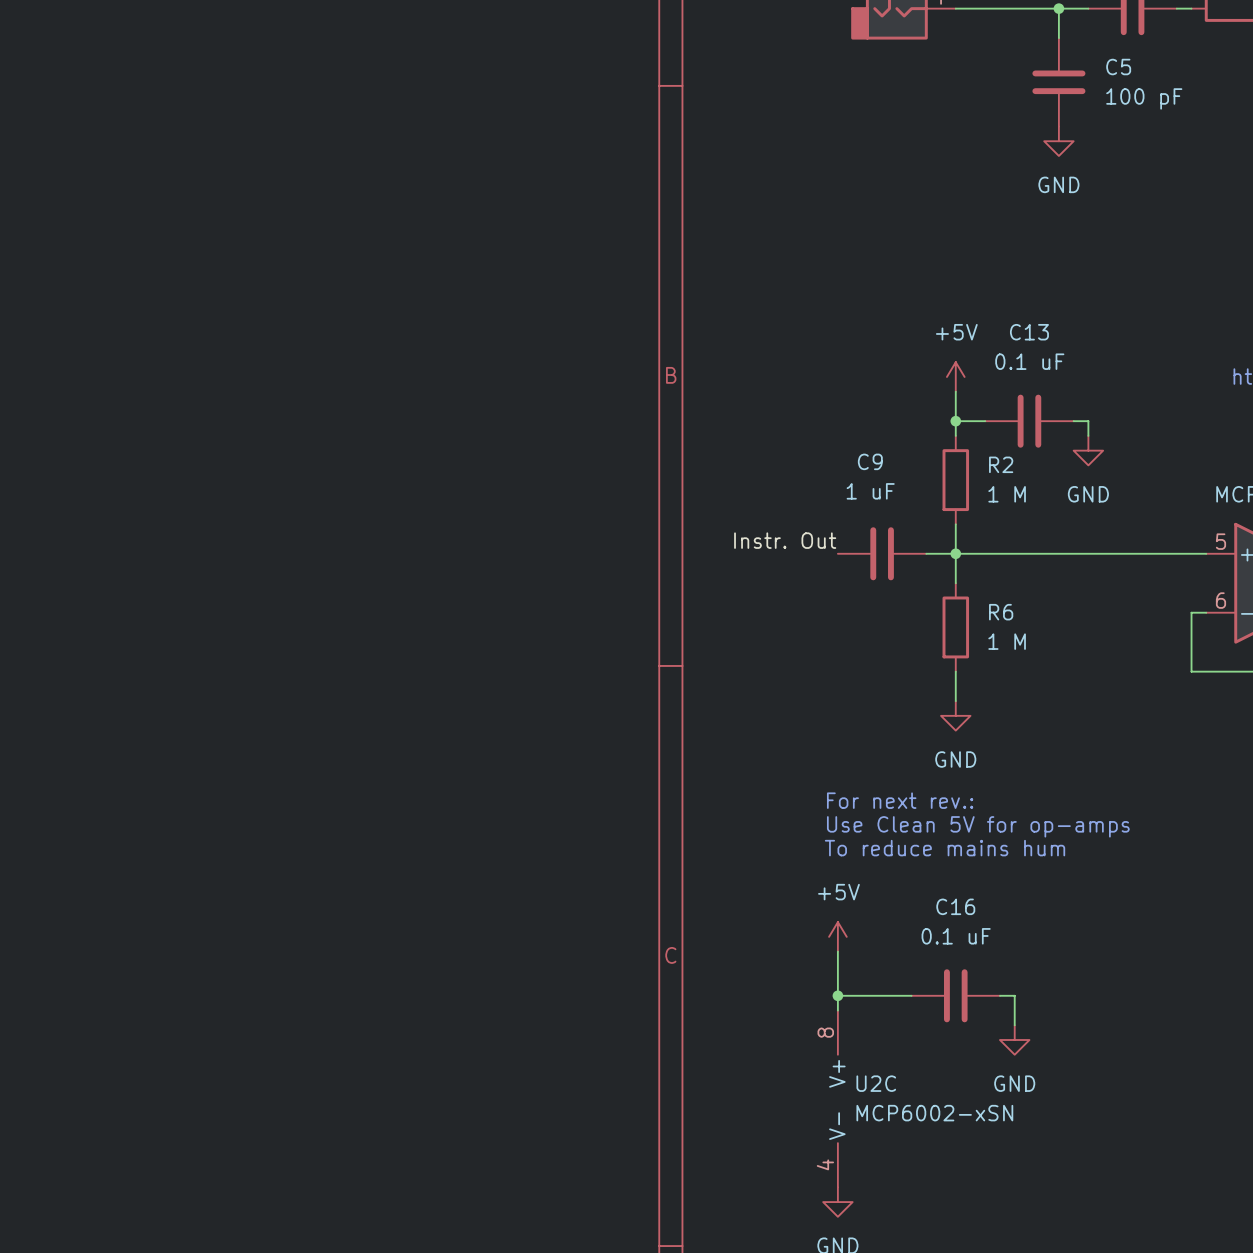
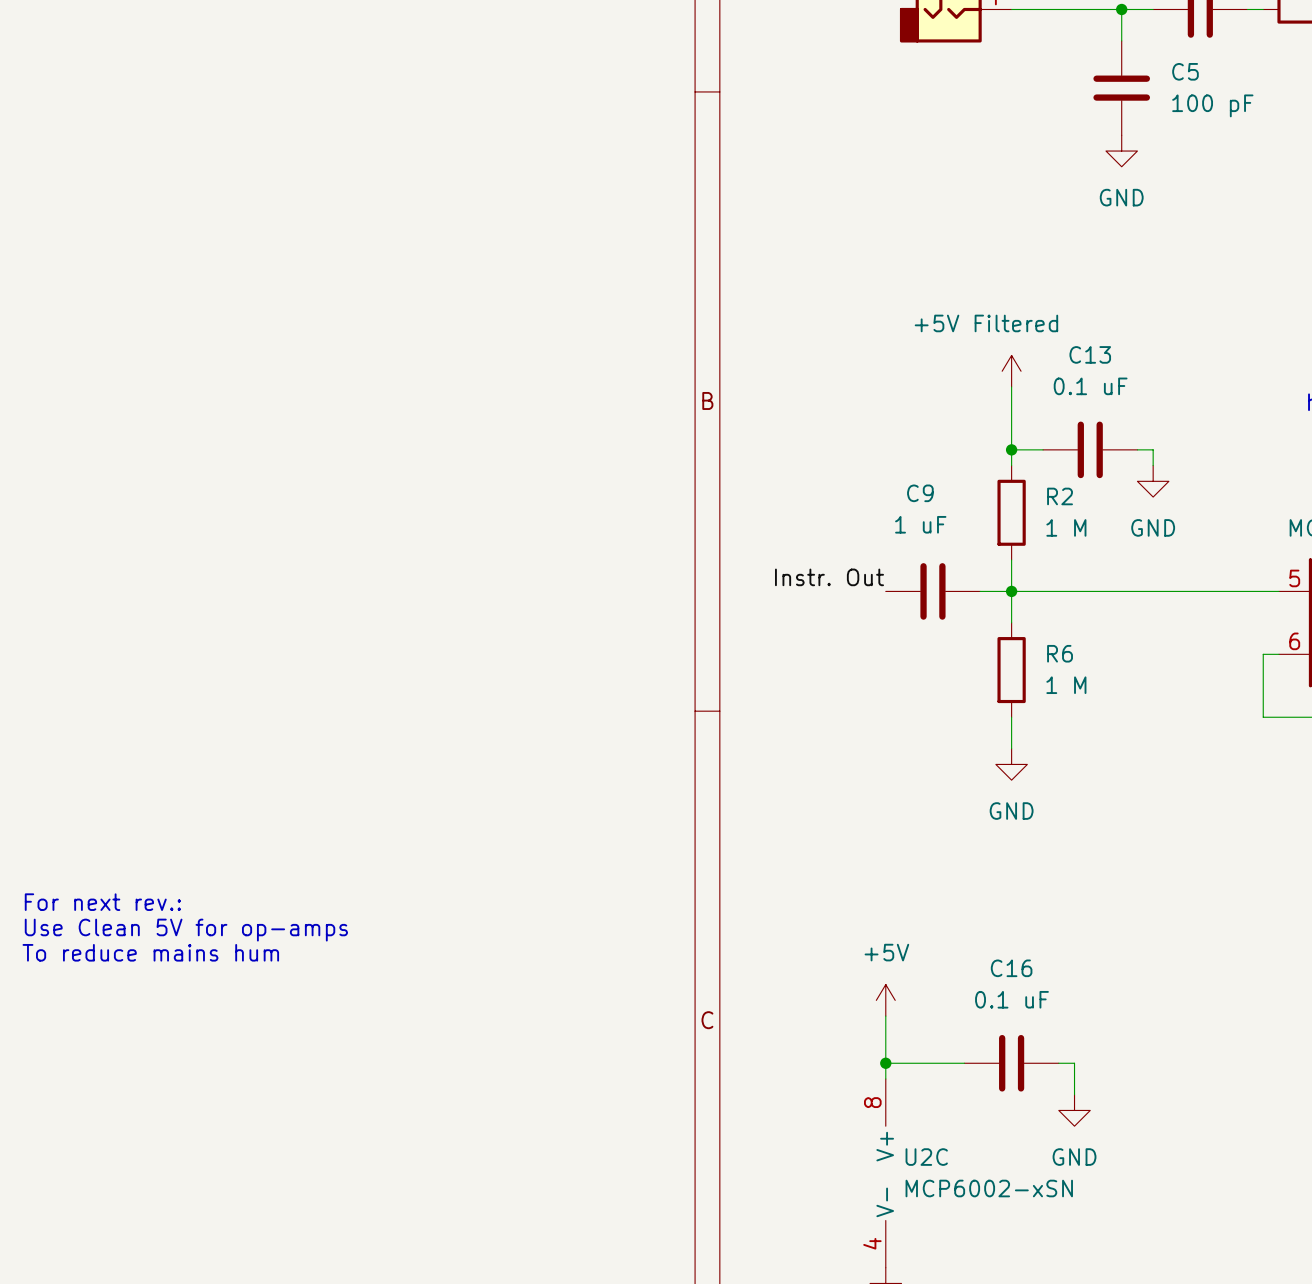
power symbol: none -> +5V Filtered (1011, 371)
power symbol: +5V (955, 376) -> none
text: For next rev.: (900, 800) -> none
text: Use Clean 5V for op-amps (978, 826) -> none
text: none -> For next rev.: (102, 902)
text: To reduce mains hum (945, 848) -> none
text: none -> Use Clean 5V for op-amps (186, 930)
text: none -> To reduce mains hum (150, 952)

